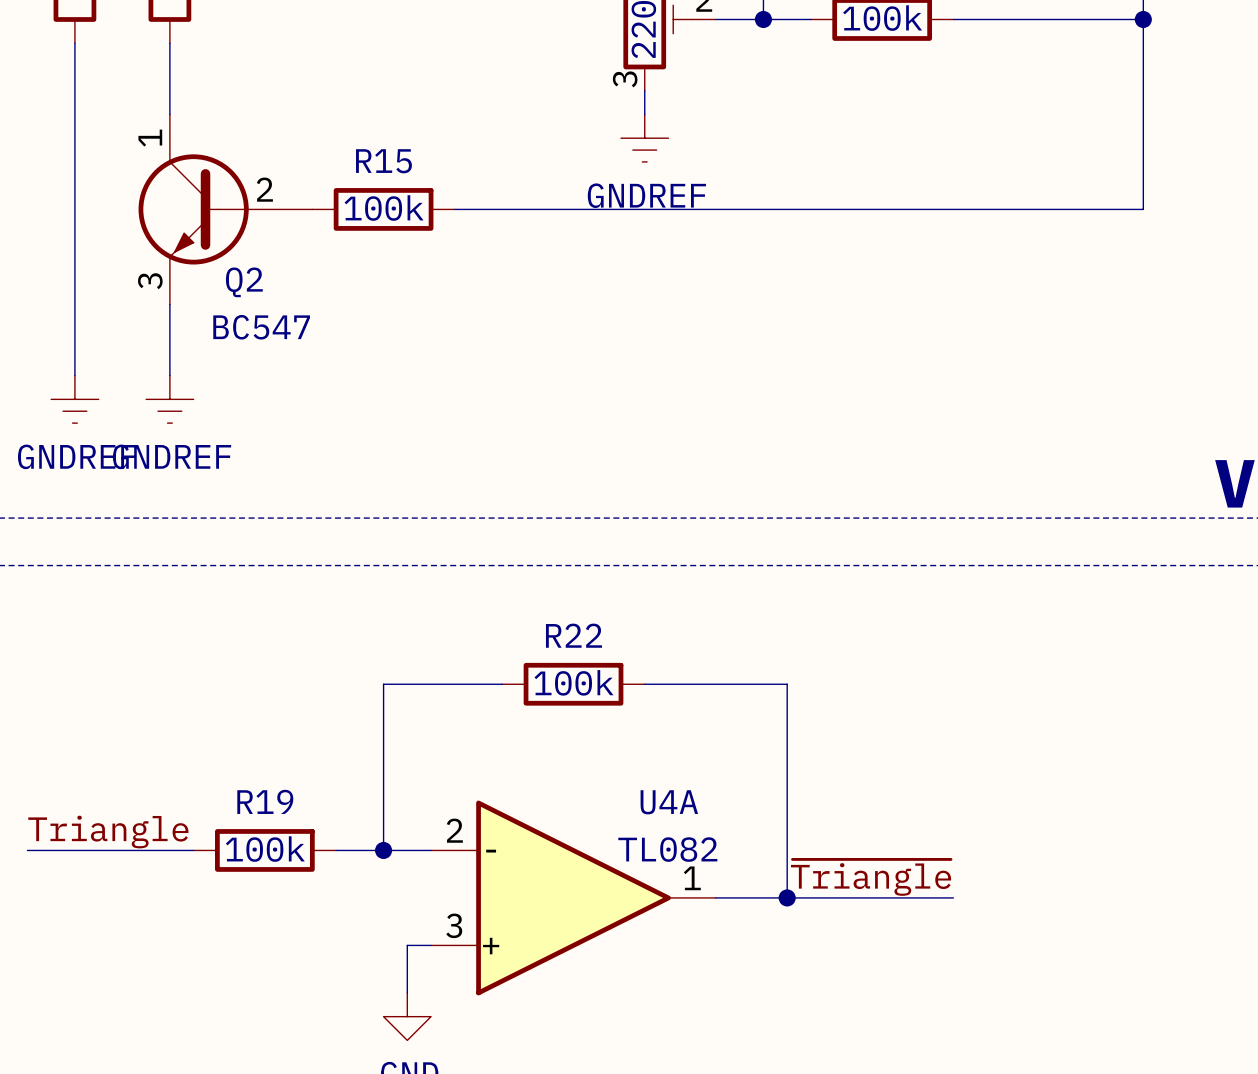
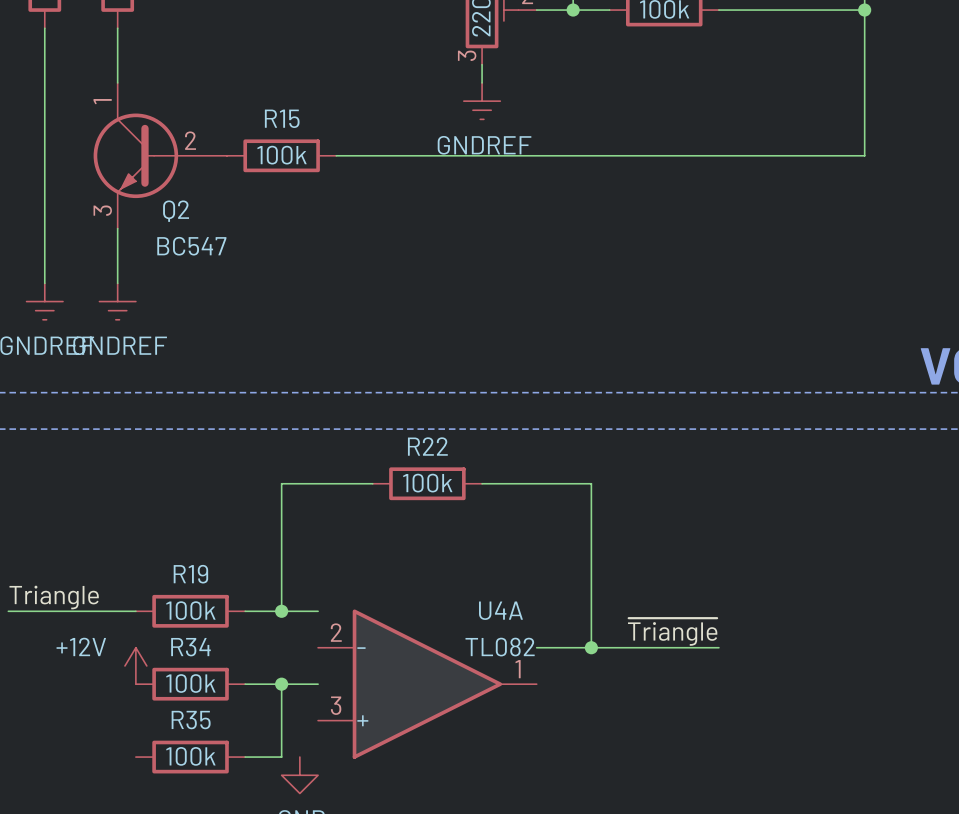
wire: (383, 684) (502, 684) -> (281, 520) (281, 483) (372, 483)
R22 position: (573, 684) -> (427, 483)
wire: (644, 684) (787, 684) -> (482, 483) (591, 483) (591, 520)
wire: (383, 802) (383, 850) -> none
junction: none -> (281, 611)
label position: Triangle (108, 832) -> Triangle (54, 597)
wire: (27, 850) (193, 850) -> (8, 611) (135, 611)
R19 position: (264, 850) -> (190, 611)
wire: (336, 850) (431, 850) -> (245, 611) (318, 611)
junction: (383, 850) -> none
wire: (787, 850) (787, 897) -> none
power symbol: none -> +12V (135, 665)
label position: ~{Triangle} (871, 877) -> ~{Triangle} (672, 631)
R34: none -> 100k (190, 684)
wire: none -> (245, 684) (318, 684)
wire: none -> (281, 684) (281, 757) (245, 757)
junction: none -> (281, 684)
wire: (715, 897) (953, 897) -> (536, 647) (718, 647)
junction position: (787, 897) -> (591, 647)
wire: (431, 945) (407, 945) (407, 992) -> none
R35: none -> 100k (190, 757)

